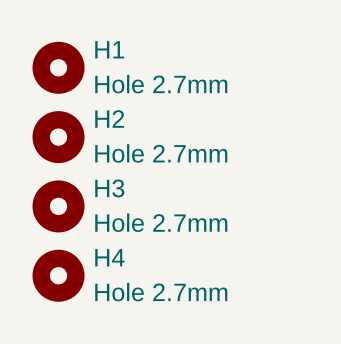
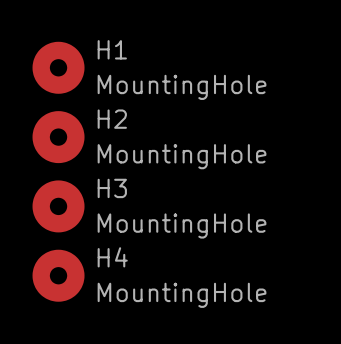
H1 value: Hole 2.7mm (161, 84) -> MountingHole (182, 87)
H2 value: Hole 2.7mm (161, 153) -> MountingHole (182, 156)
H3 value: Hole 2.7mm (161, 222) -> MountingHole (182, 225)
H4 value: Hole 2.7mm (161, 292) -> MountingHole (182, 295)

